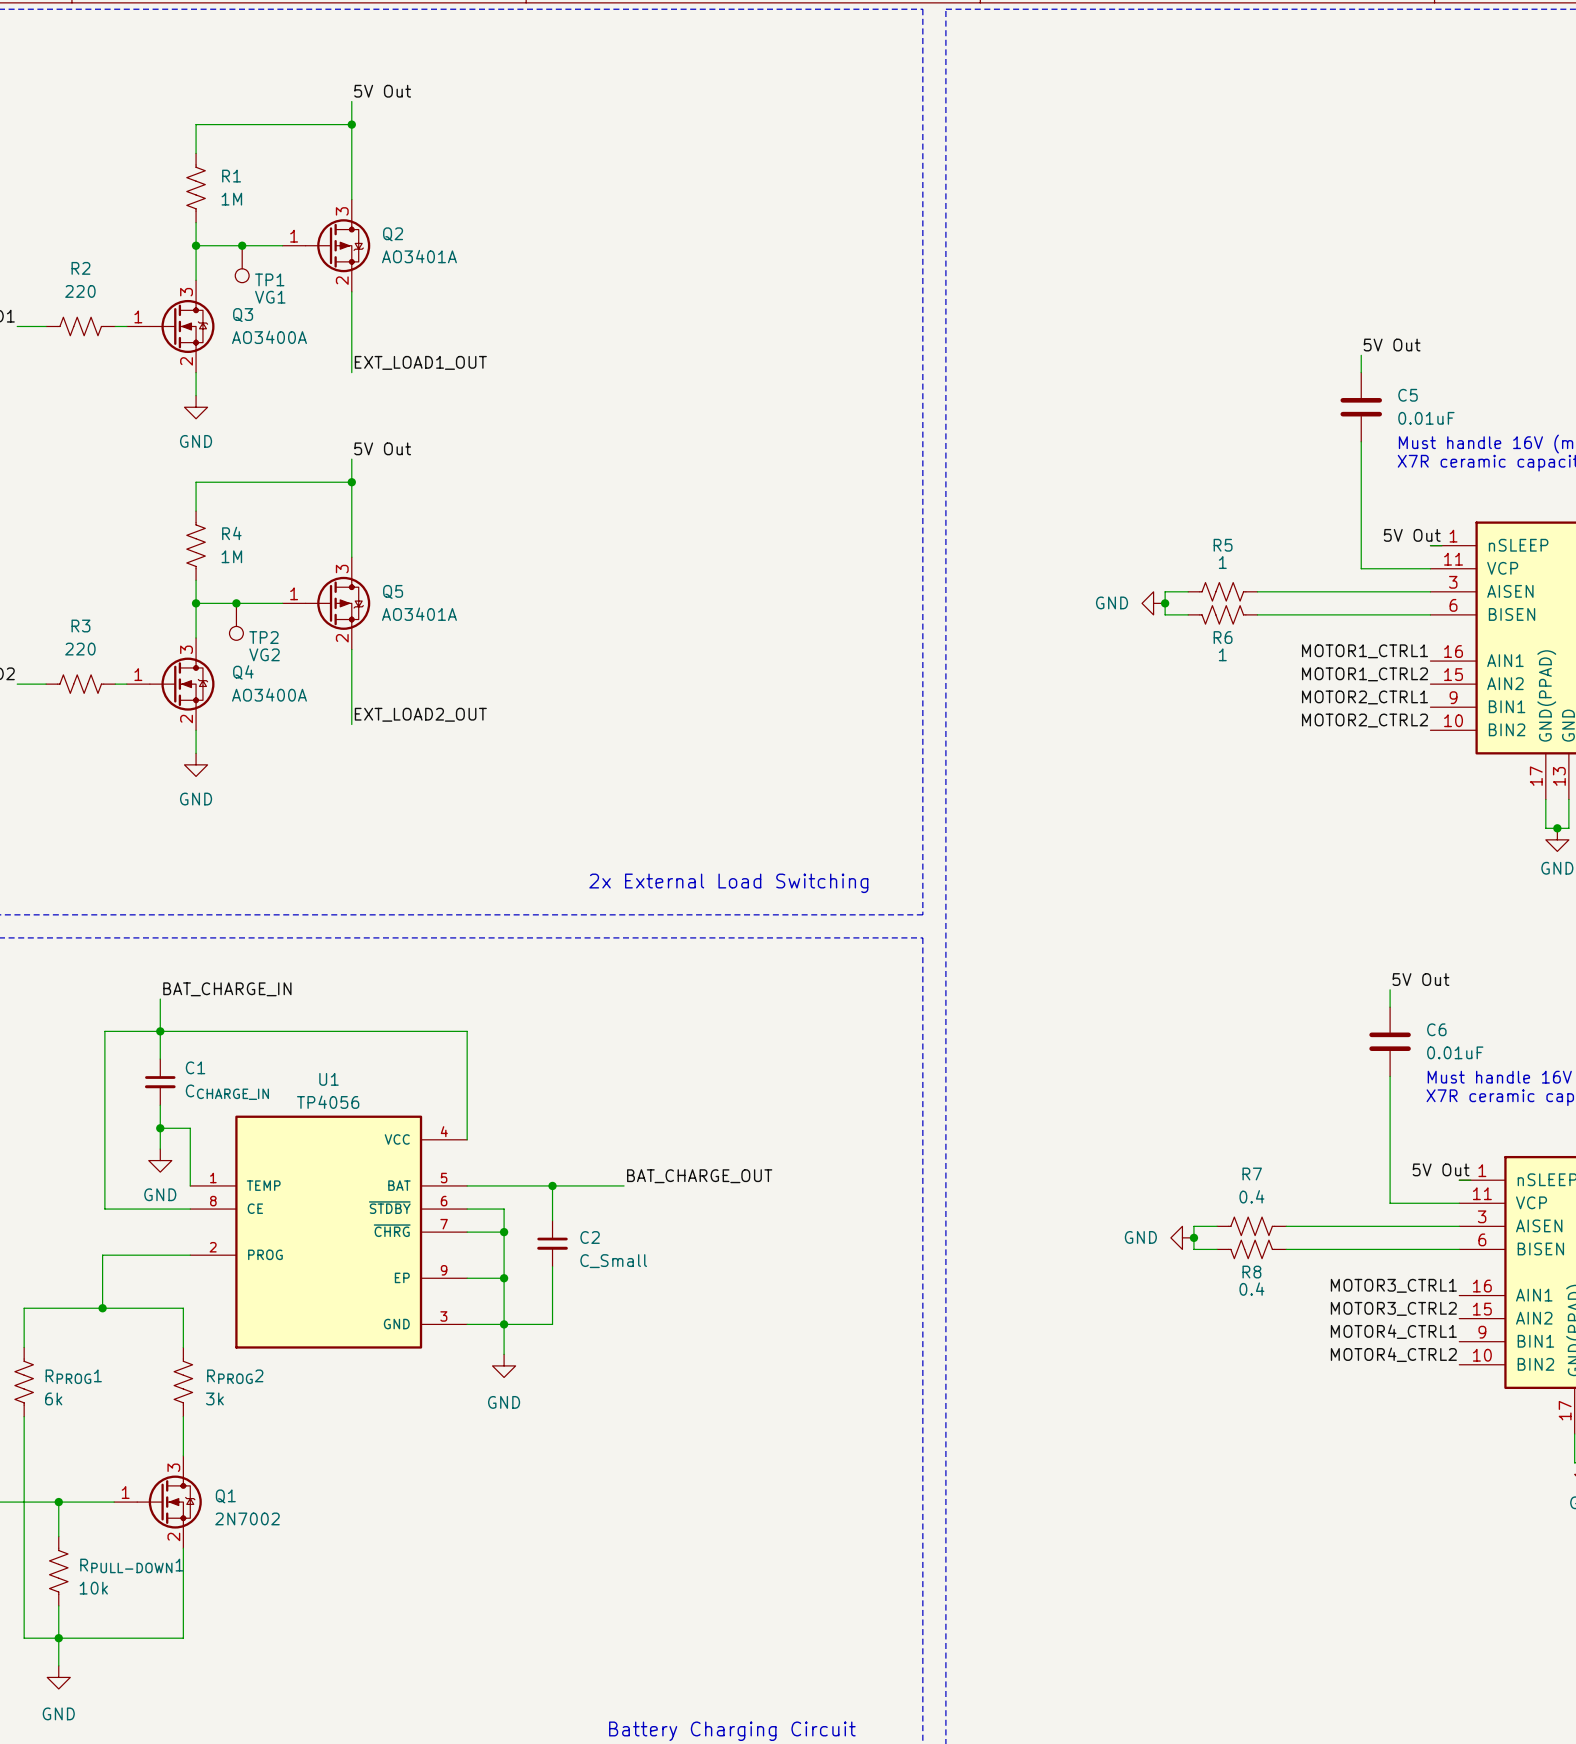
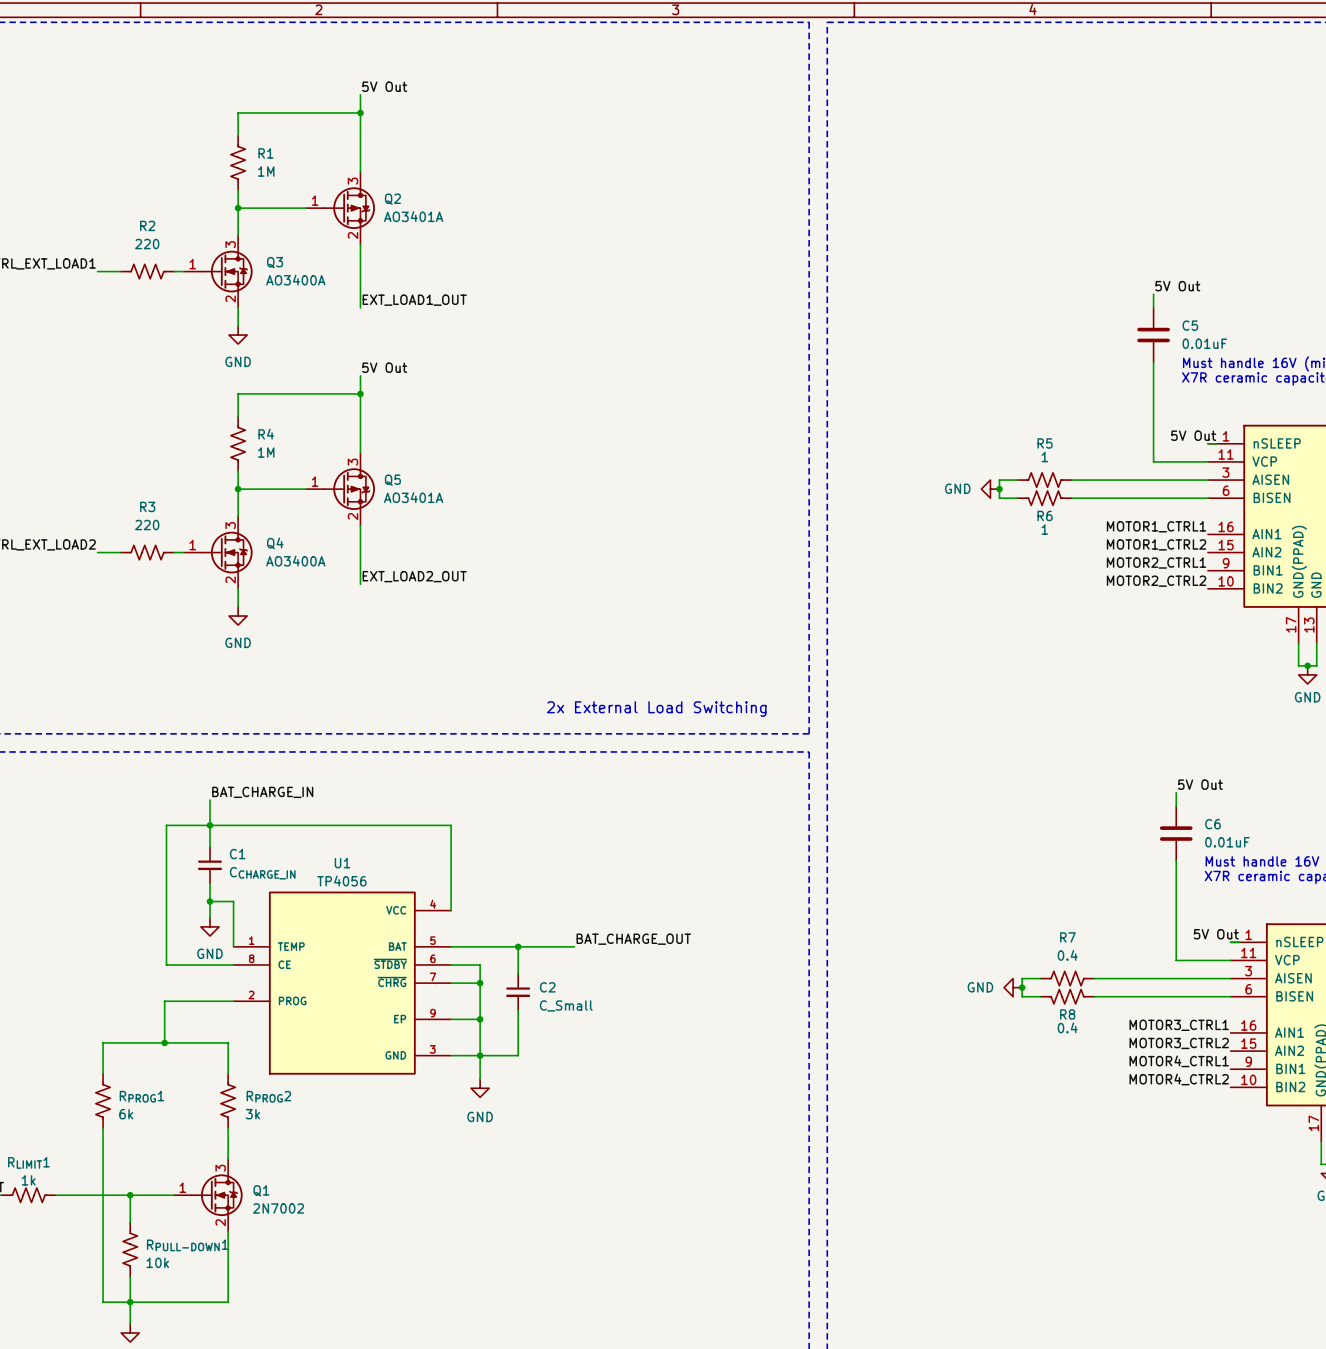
junction: (242, 245) -> none
TP1: VG1 (242, 264) -> none
junction: (236, 603) -> none
TP2: VG2 (236, 621) -> none

